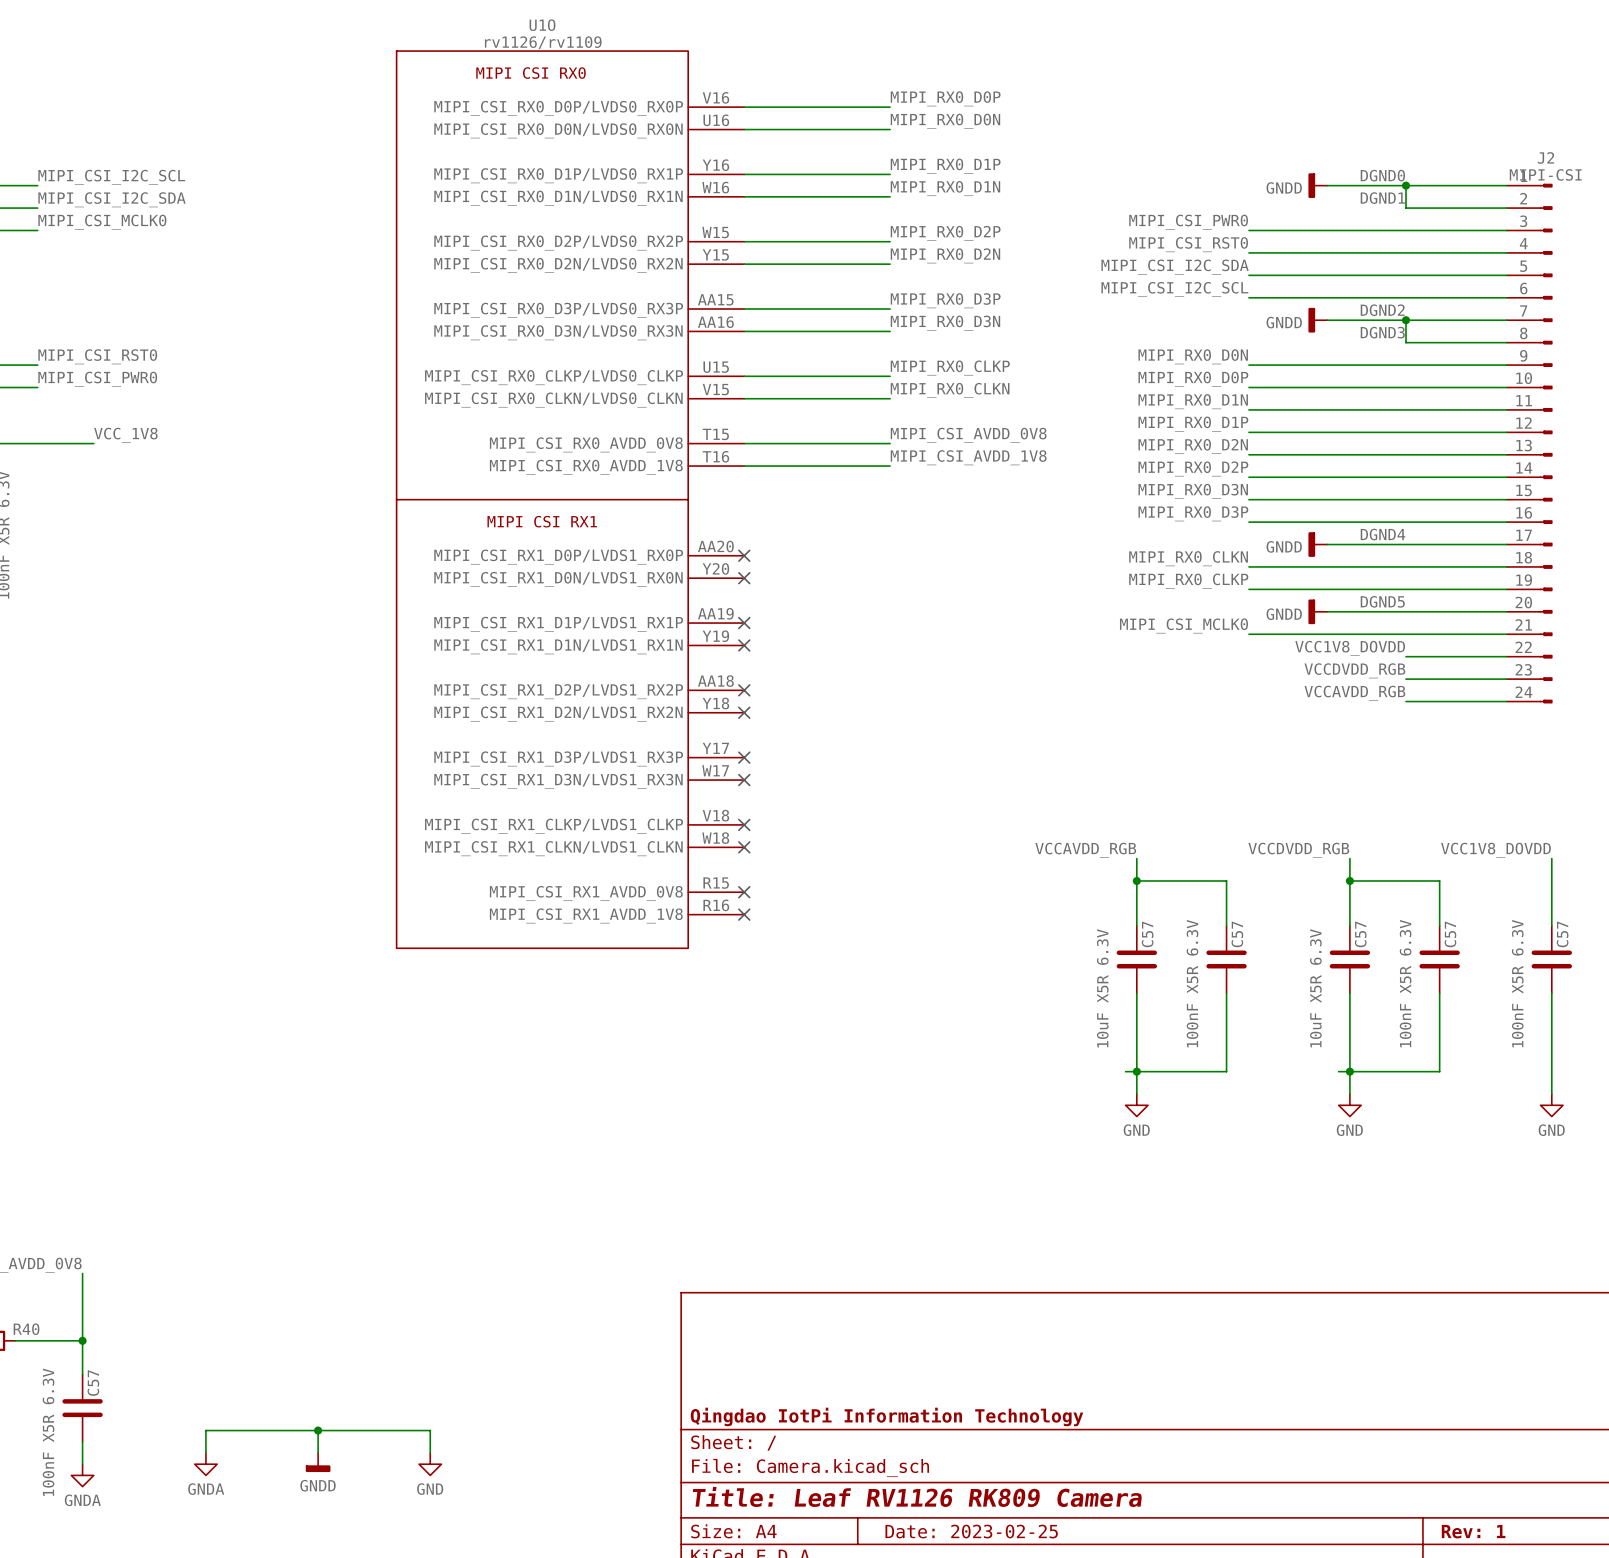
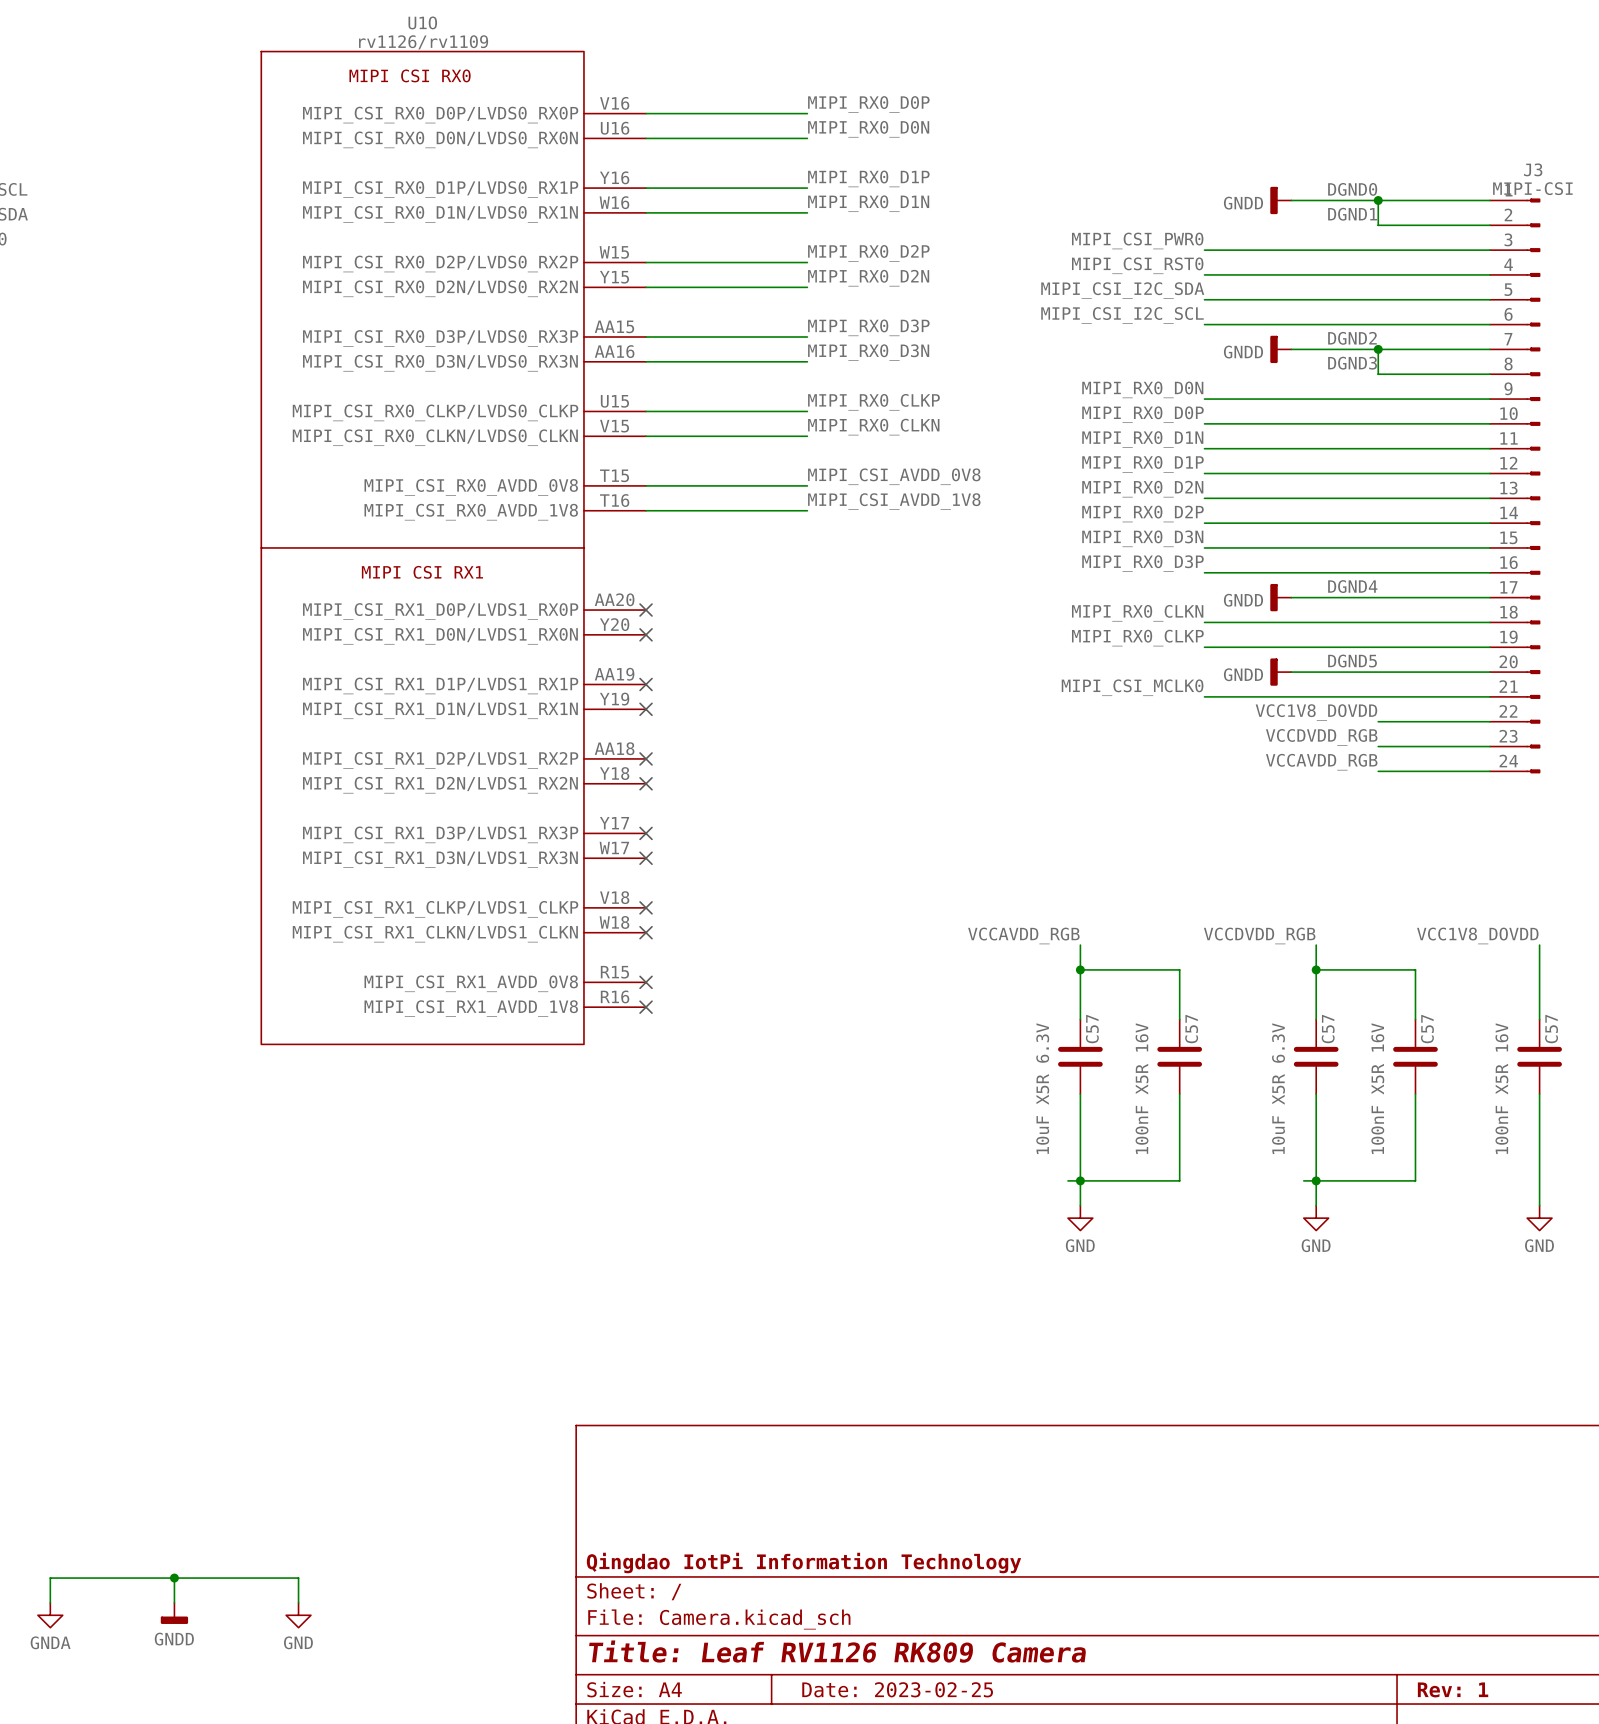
J2 name: J2 (1545, 157) -> J3 (1533, 169)
C57 value: 100nF X5R 6.3V (1192, 983) -> 100nF X5R 16V (1142, 1088)
C57 value: 100nF X5R 6.3V (1405, 983) -> 100nF X5R 16V (1377, 1088)
C57 value: 100nF X5R 6.3V (1517, 983) -> 100nF X5R 16V (1501, 1088)

